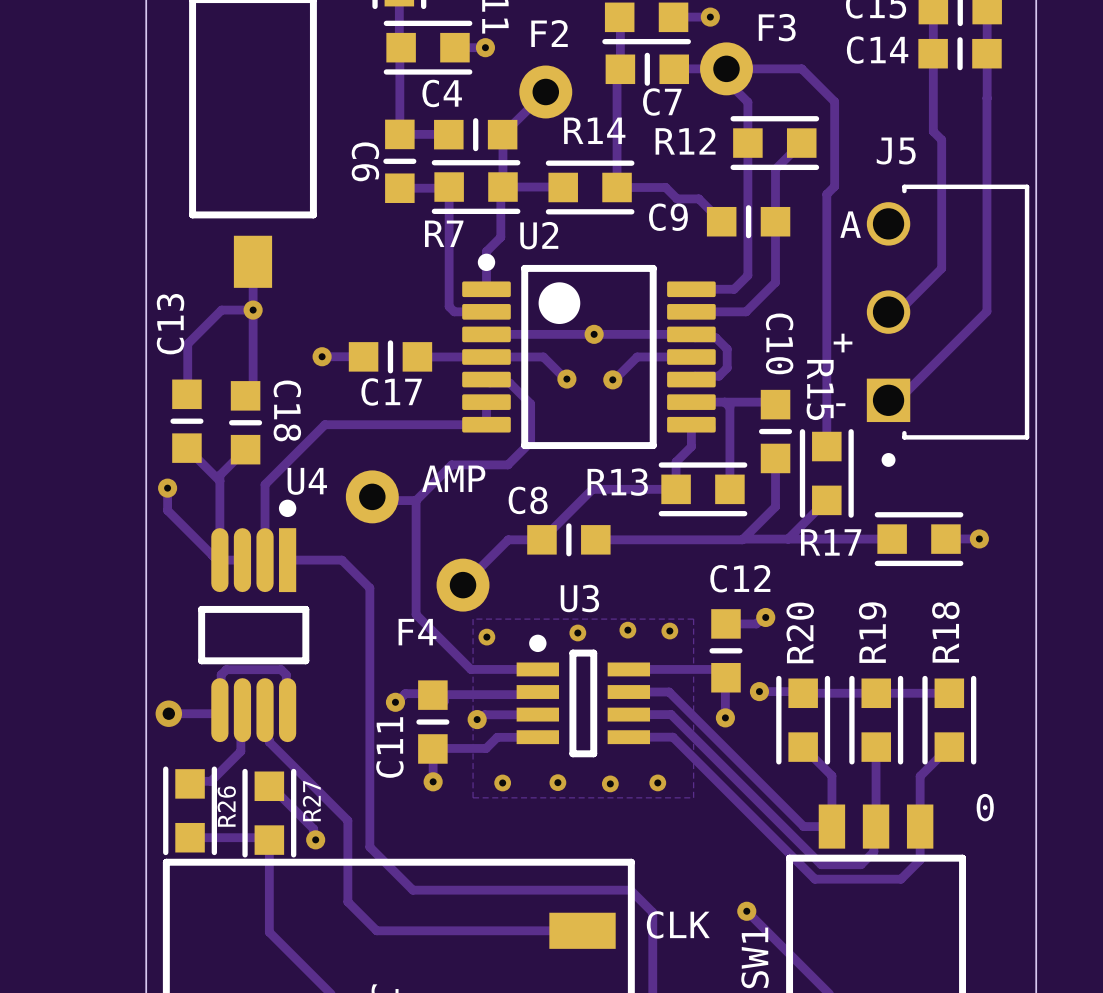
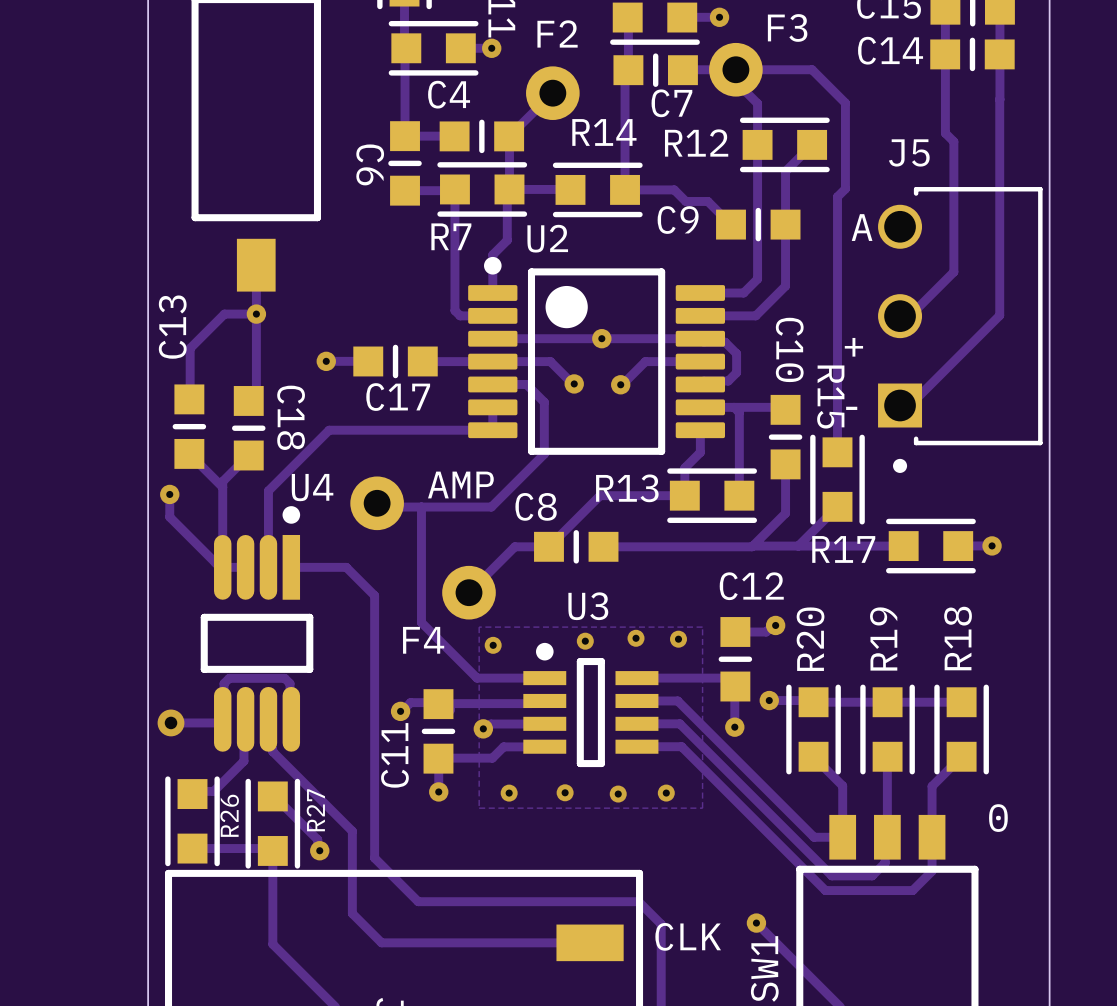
track: (486, 379) (489, 382) (509, 382) (530, 403) (530, 442) (507, 464) (451, 464) (416, 500) -> (492, 384) (526, 384) (544, 402) (544, 454) (491, 507) (421, 507)

